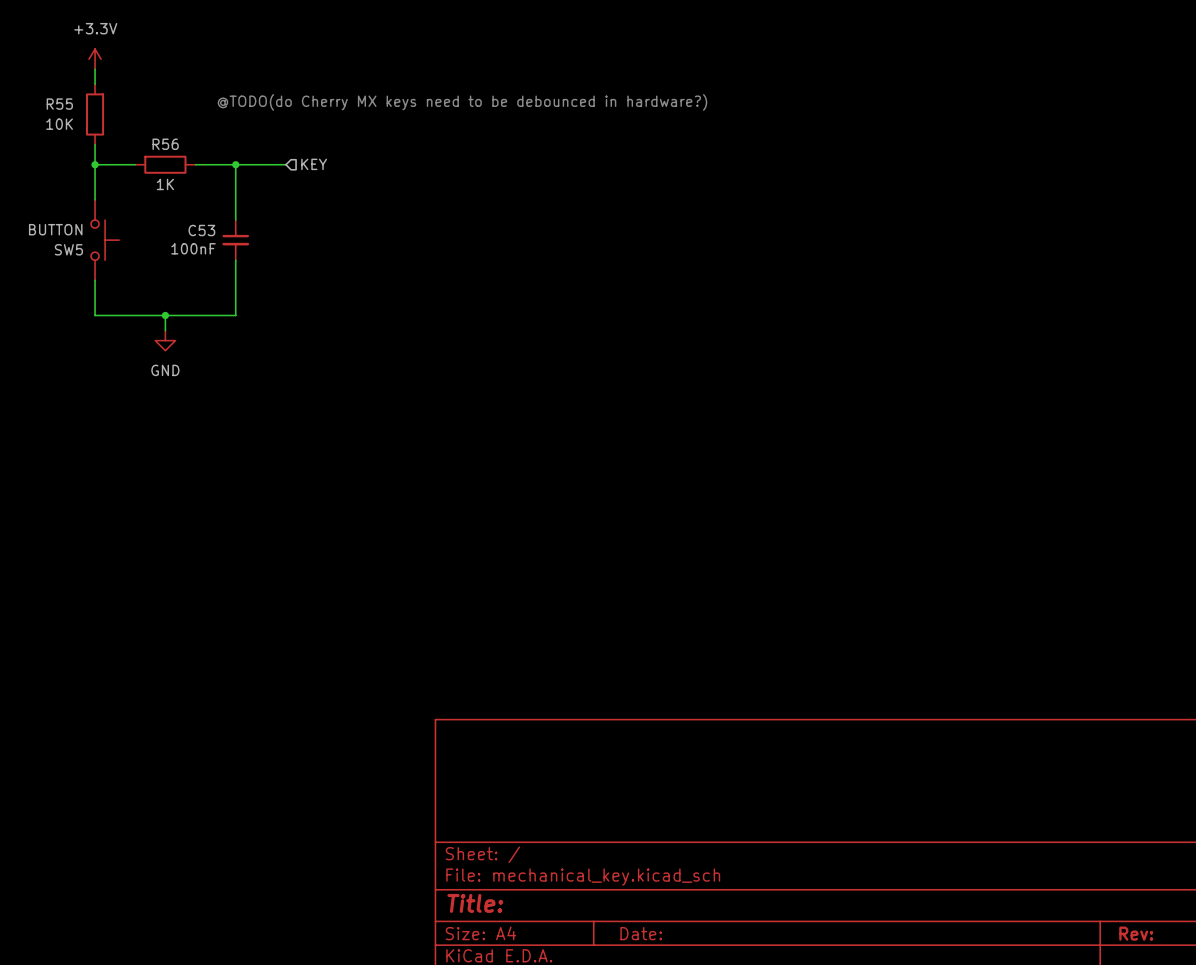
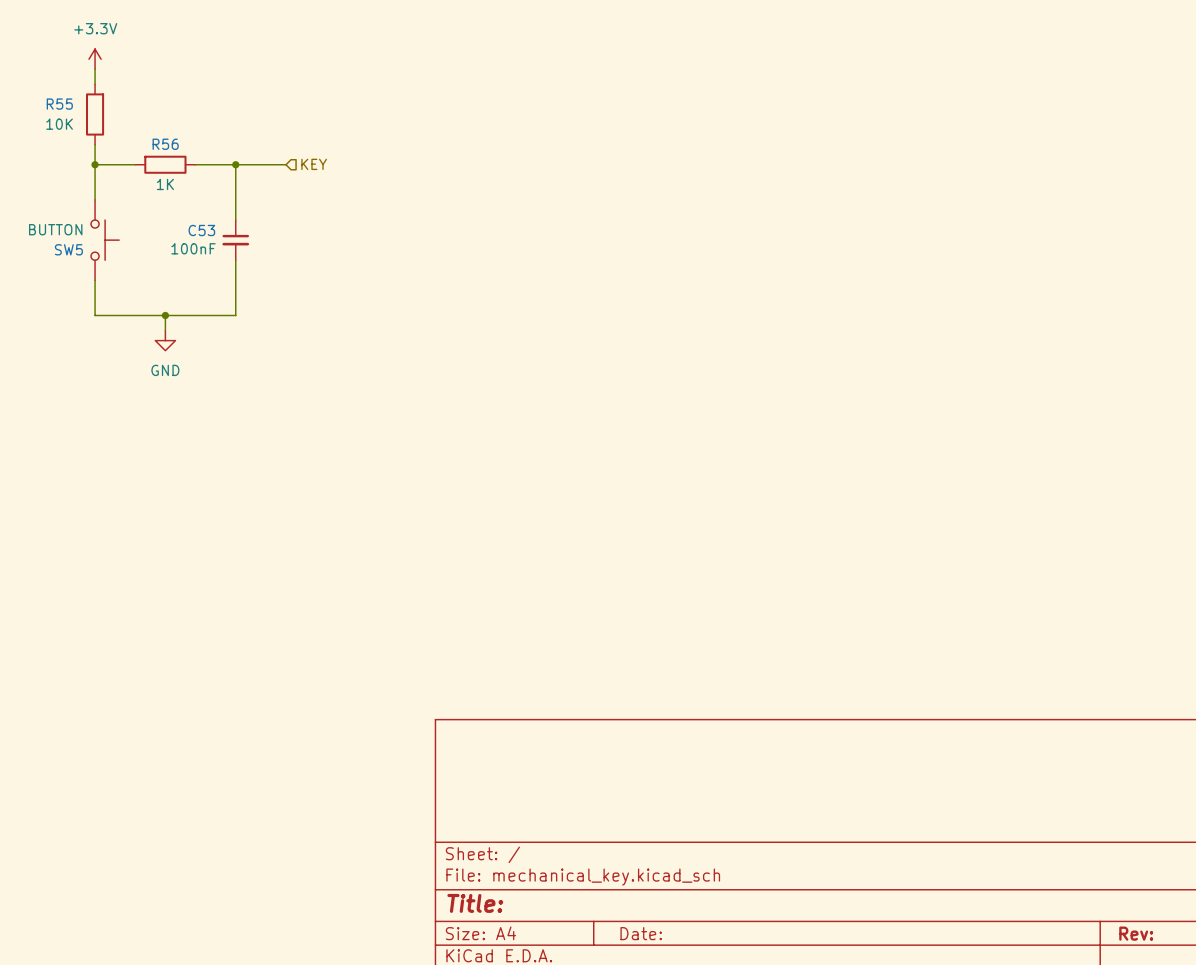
text: @TODO(do Cherry MX keys need to be debounced in hardware?) (462, 102) -> none

